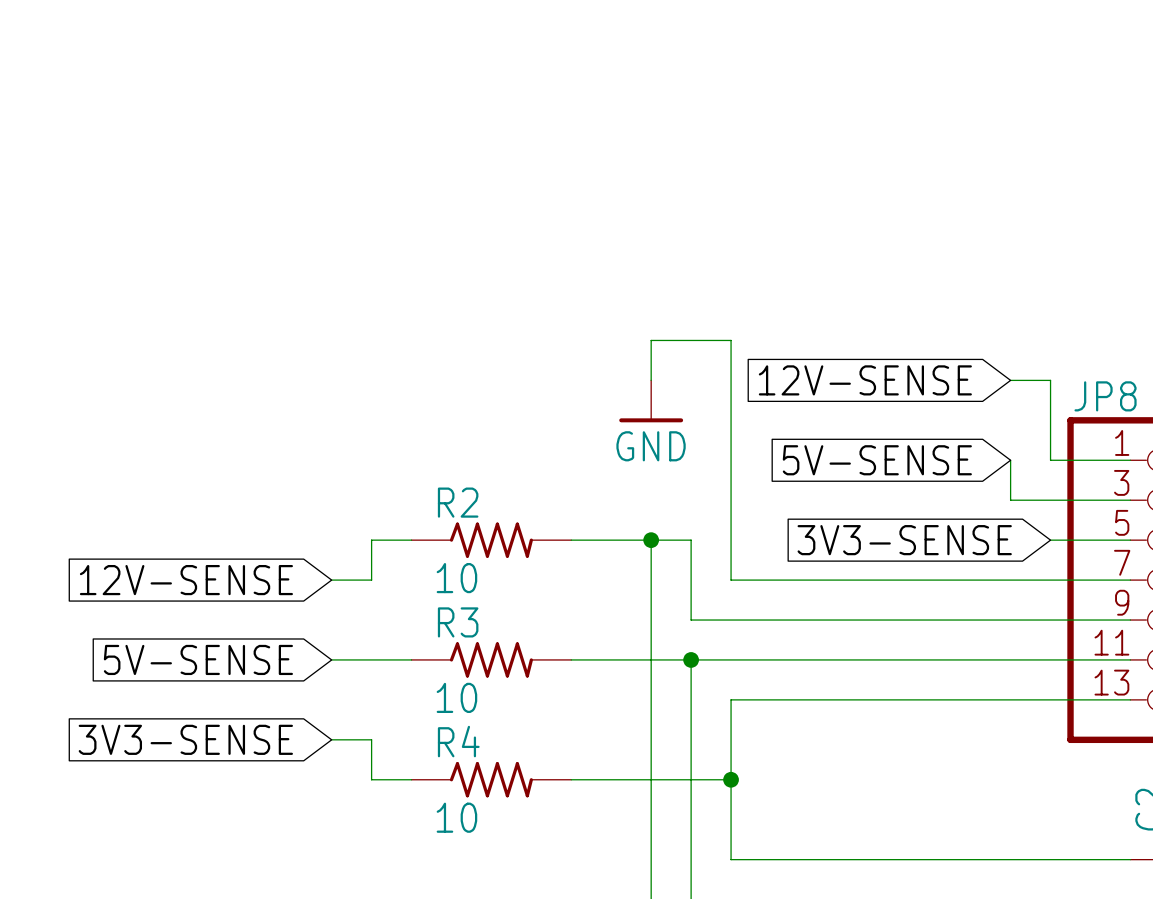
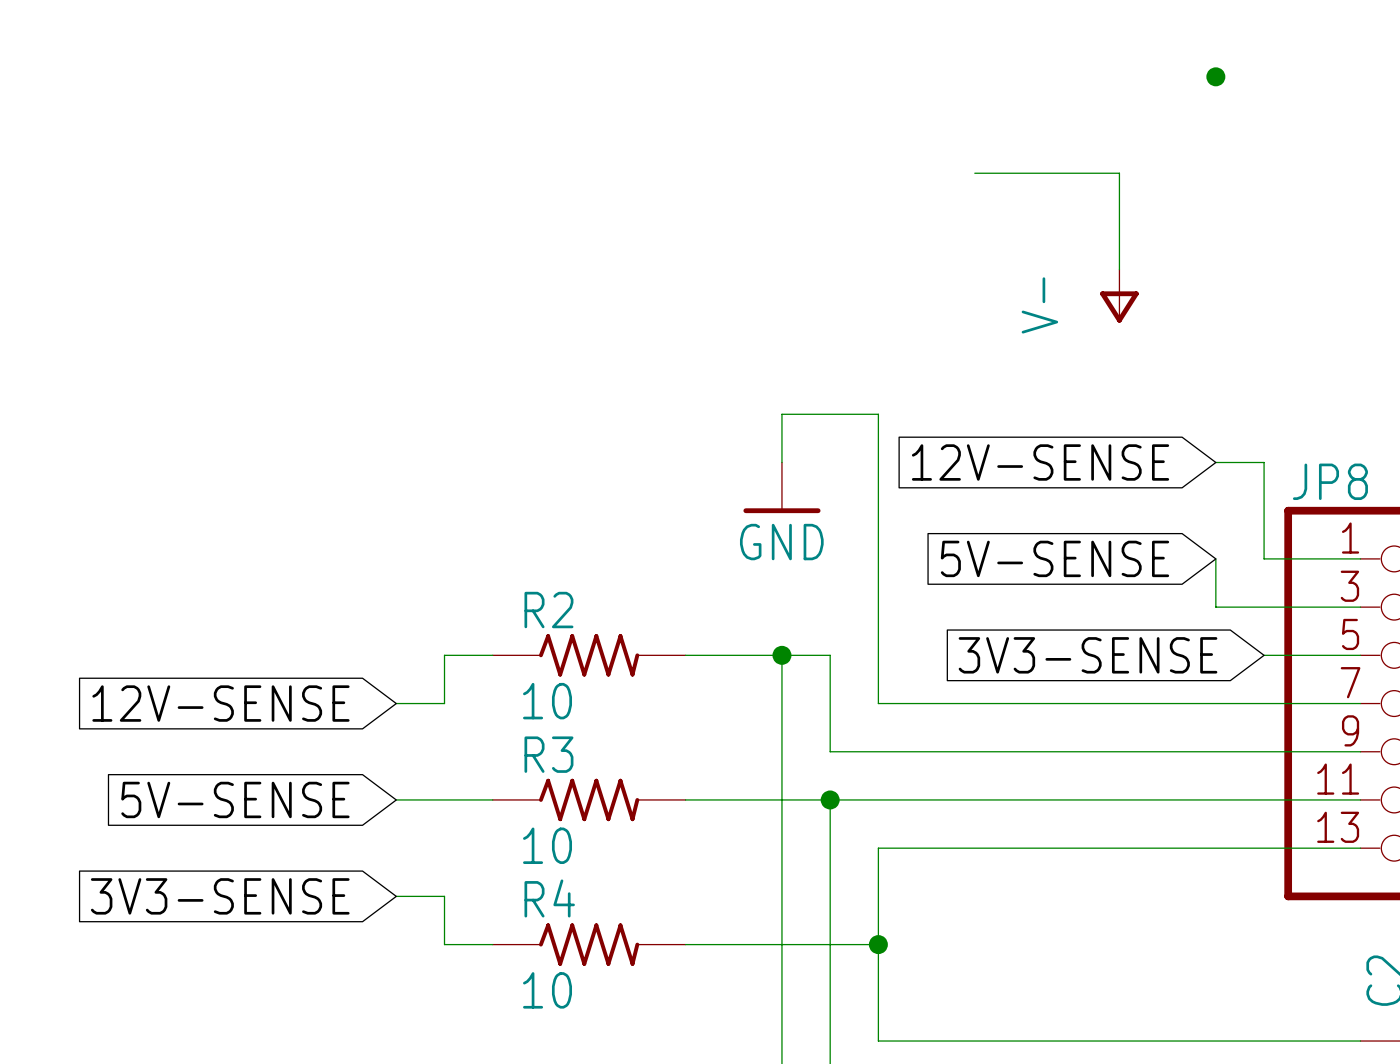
junction: none -> (1215, 76)
wire: none -> (974, 173) (1119, 173) (1119, 269)
power symbol: none -> V- (1119, 296)

